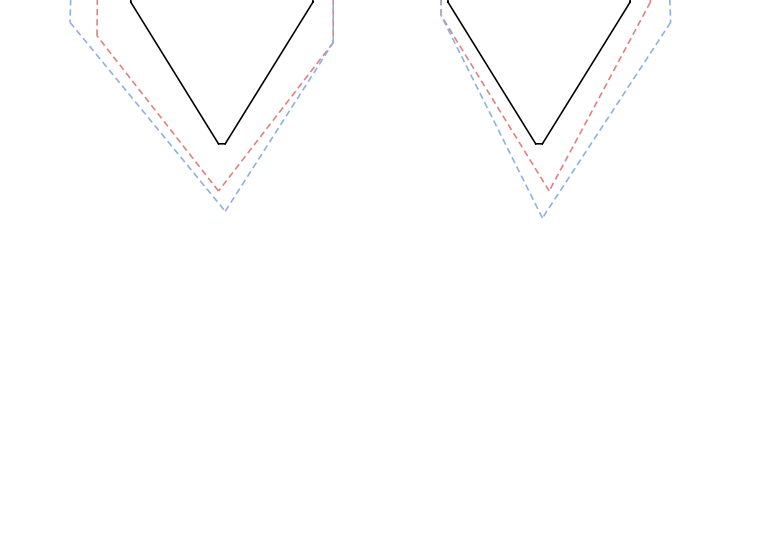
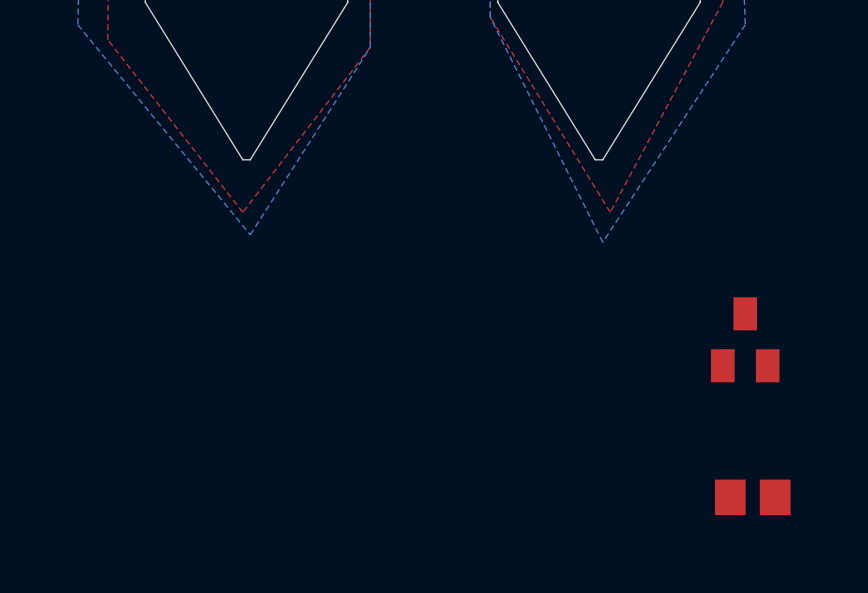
part: none -> (745, 339)
part: none -> (752, 497)

